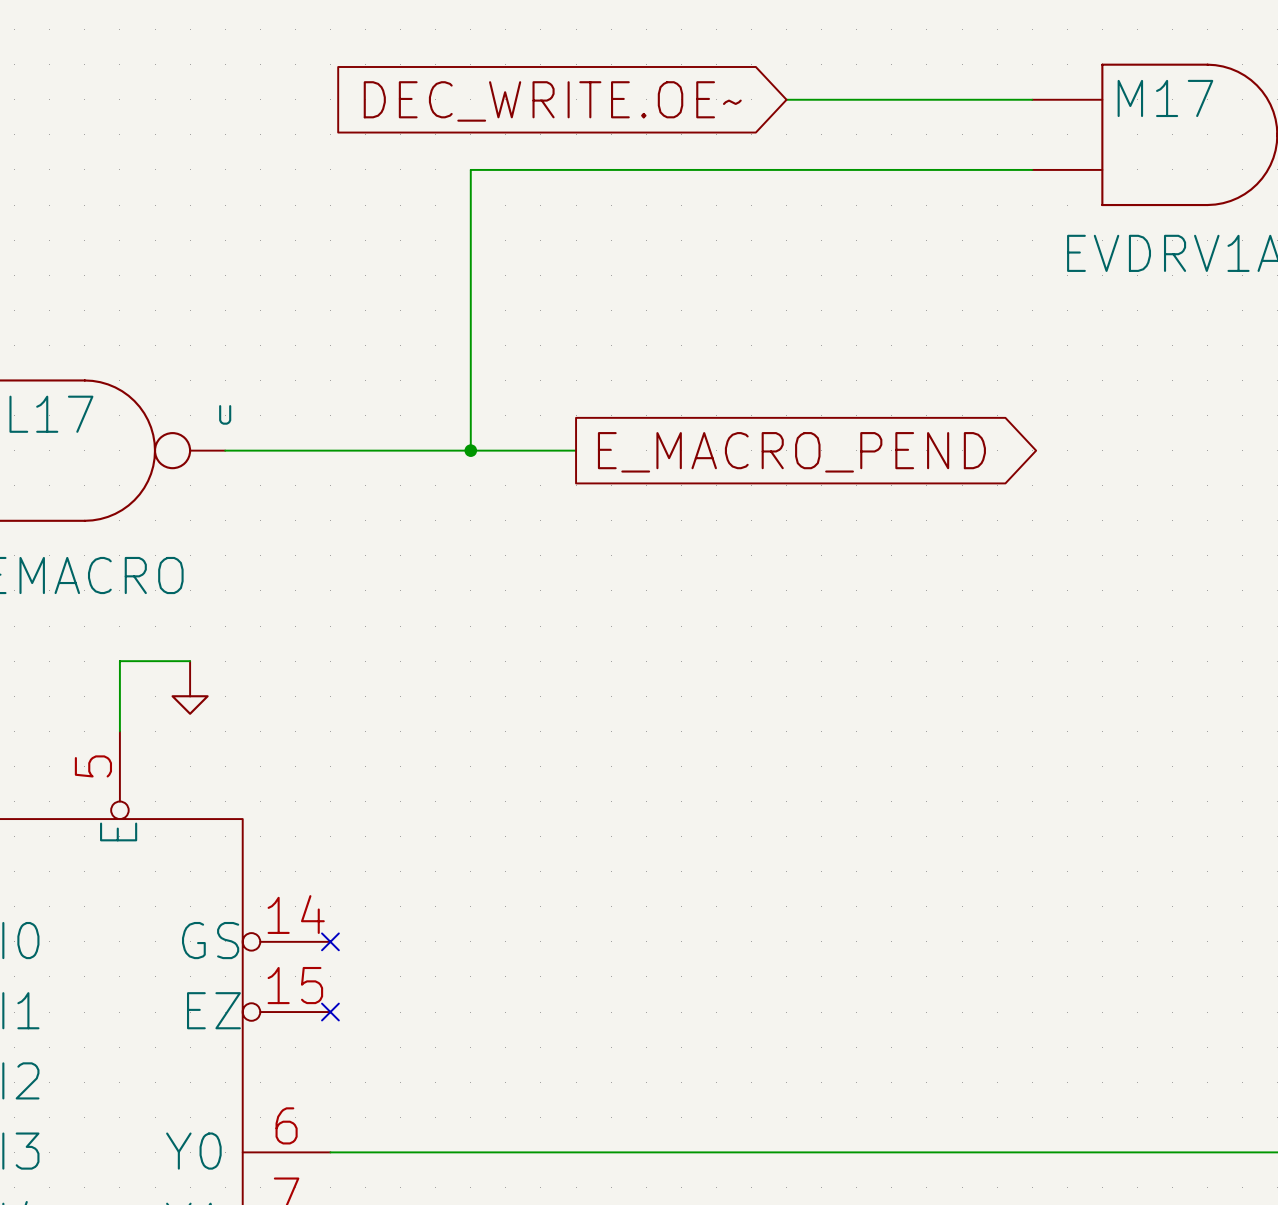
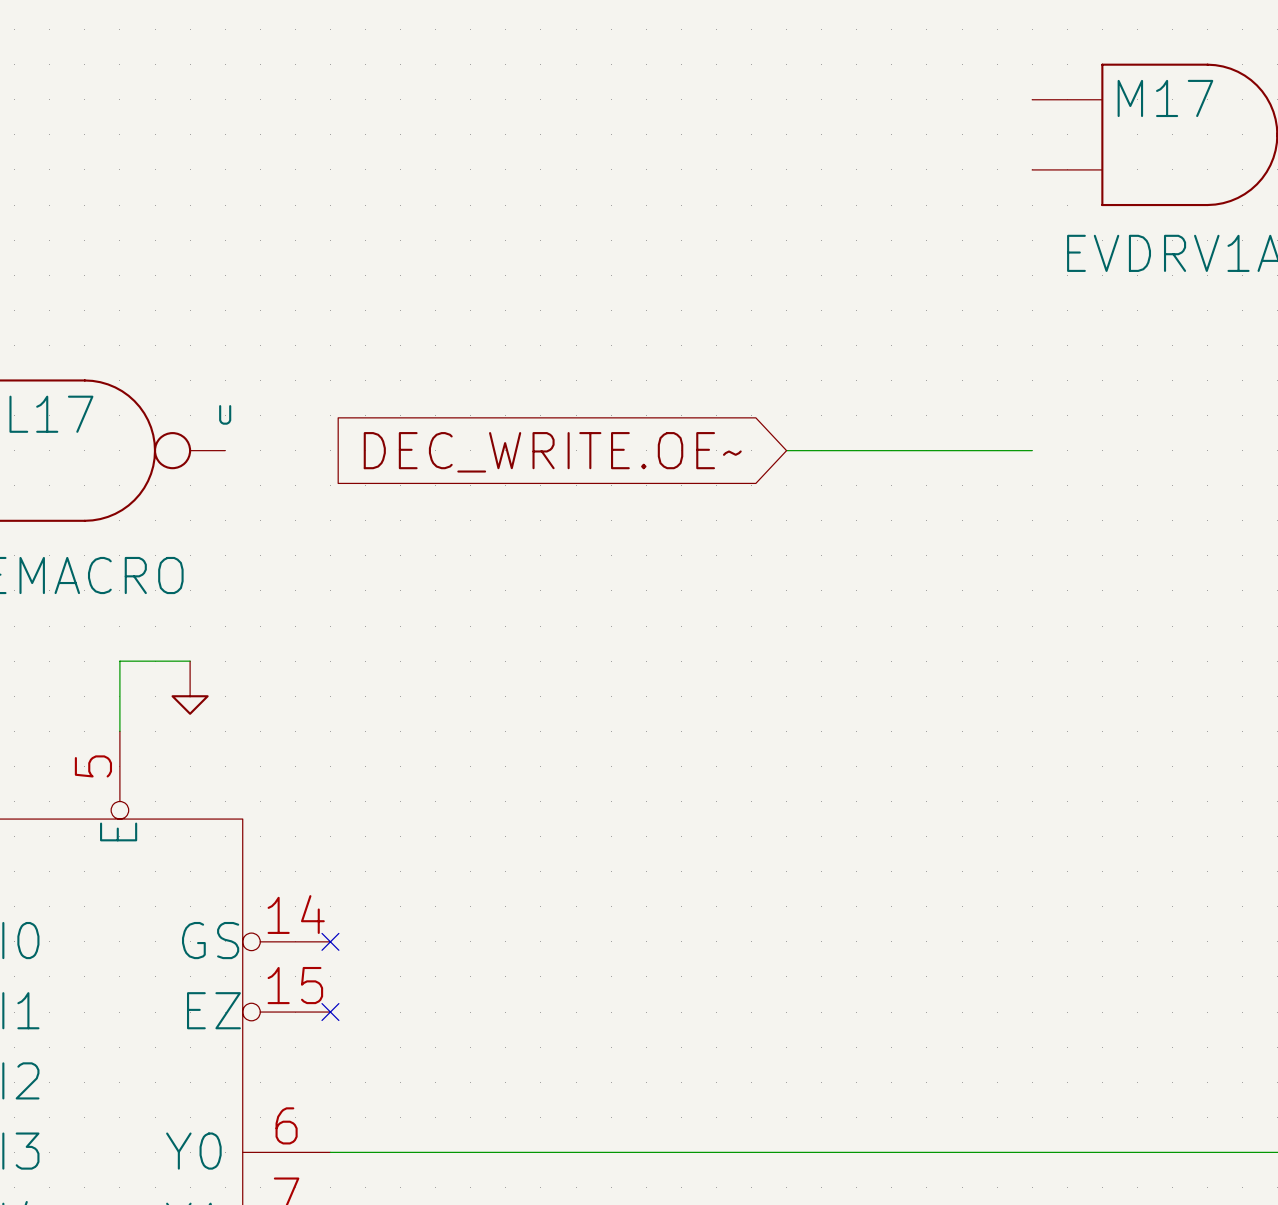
wire: (786, 99) (1032, 99) -> none
global label: DEC_WRITE.OE~ (552, 101) -> none
wire: (1032, 169) (470, 169) (470, 450) -> none
wire: (225, 450) (576, 450) -> none
junction: (470, 450) -> none
wire: none -> (786, 450) (1032, 450)
global label: none -> DEC_WRITE.OE~ (552, 452)
global label: E_MACRO_PEND (791, 452) -> none

